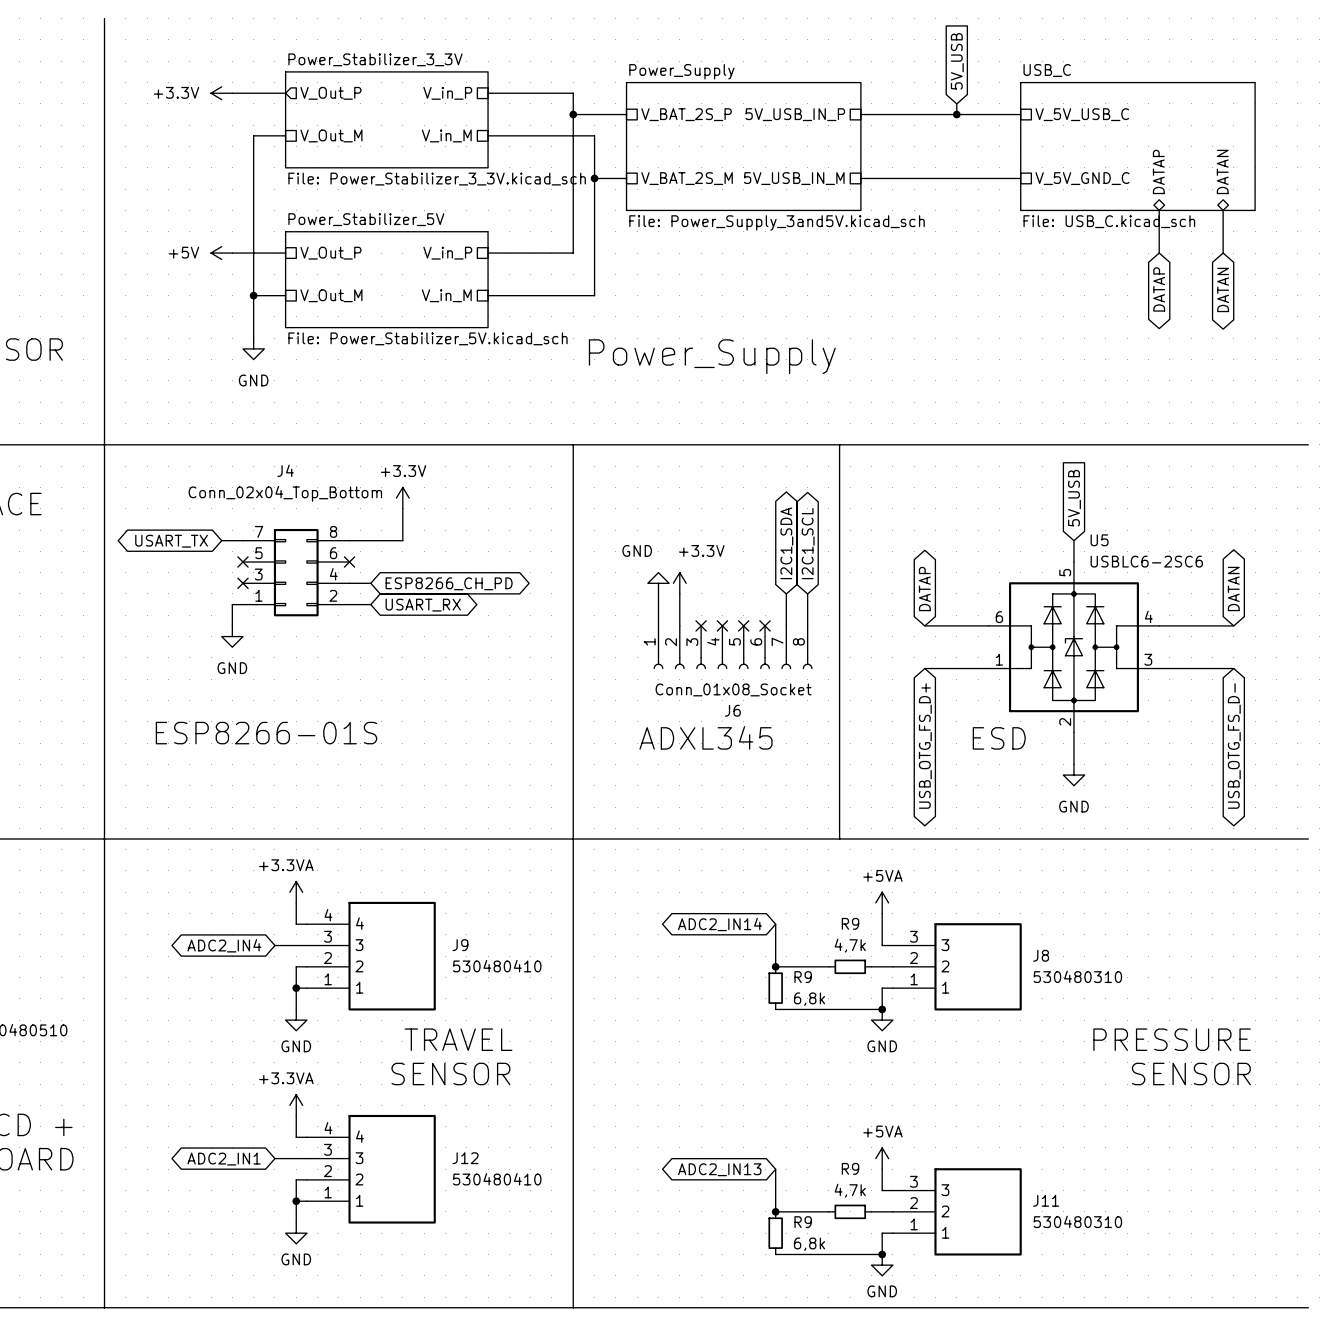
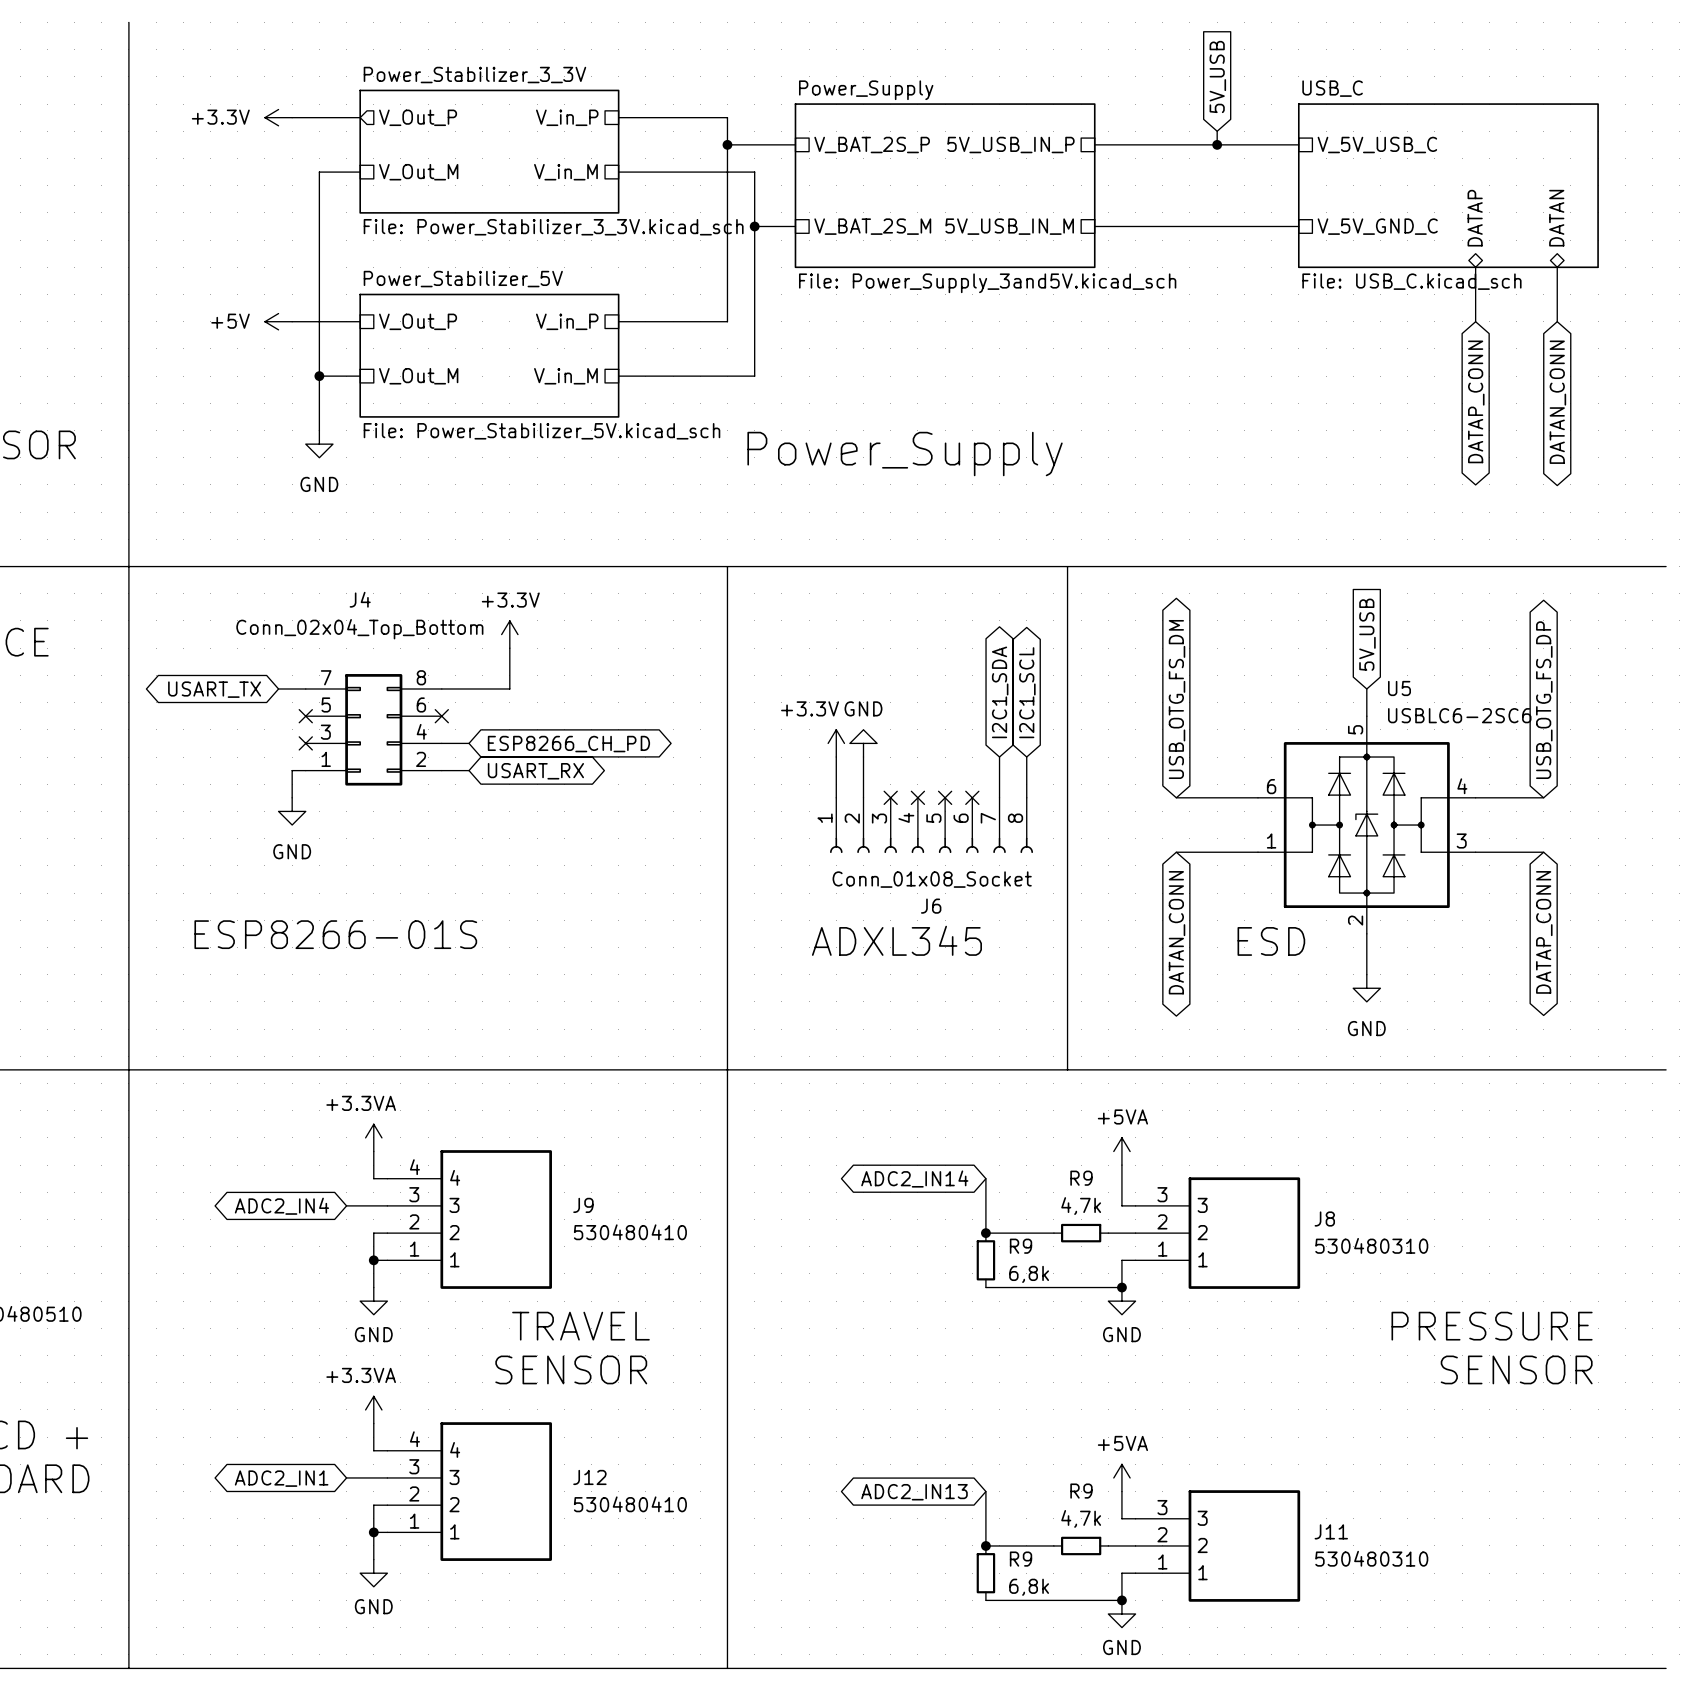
global label: DATAP (1159, 289) -> DATAP_CONN (1476, 401)
global label: DATAN (1223, 289) -> DATAN_CONN (1557, 402)
global label: none -> USB_OTG_FS_DP (1544, 700)
power symbol: GND (658, 583) -> +3.3V (836, 743)
power symbol: +3.3V (679, 583) -> GND (863, 743)
global label: DATAP (924, 588) -> USB_OTG_FS_DM (1177, 699)
global label: DATAN (1233, 588) -> none
wire: (1212, 625) (1233, 625) -> none
wire: (1212, 668) (1233, 668) -> none
global label: none -> DATAP_CONN (1544, 932)
global label: USB_OTG_FS_D+ (925, 746) -> DATAN_CONN (1177, 932)
global label: USB_OTG_FS_D- (1234, 746) -> none

